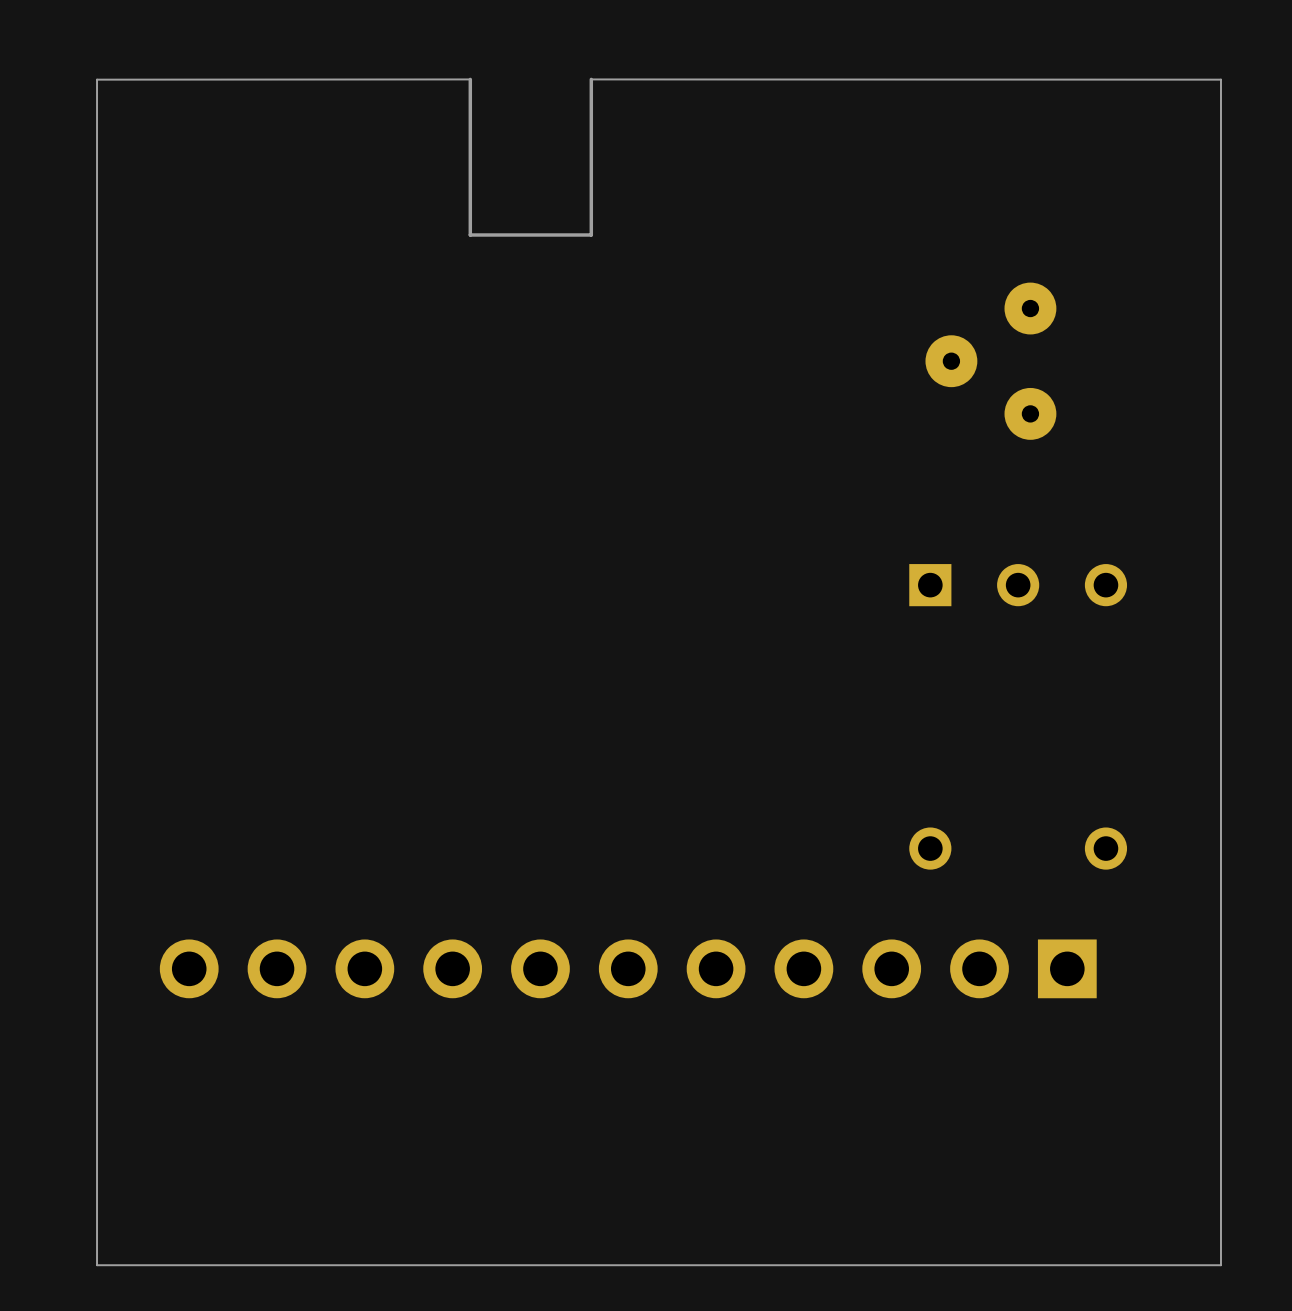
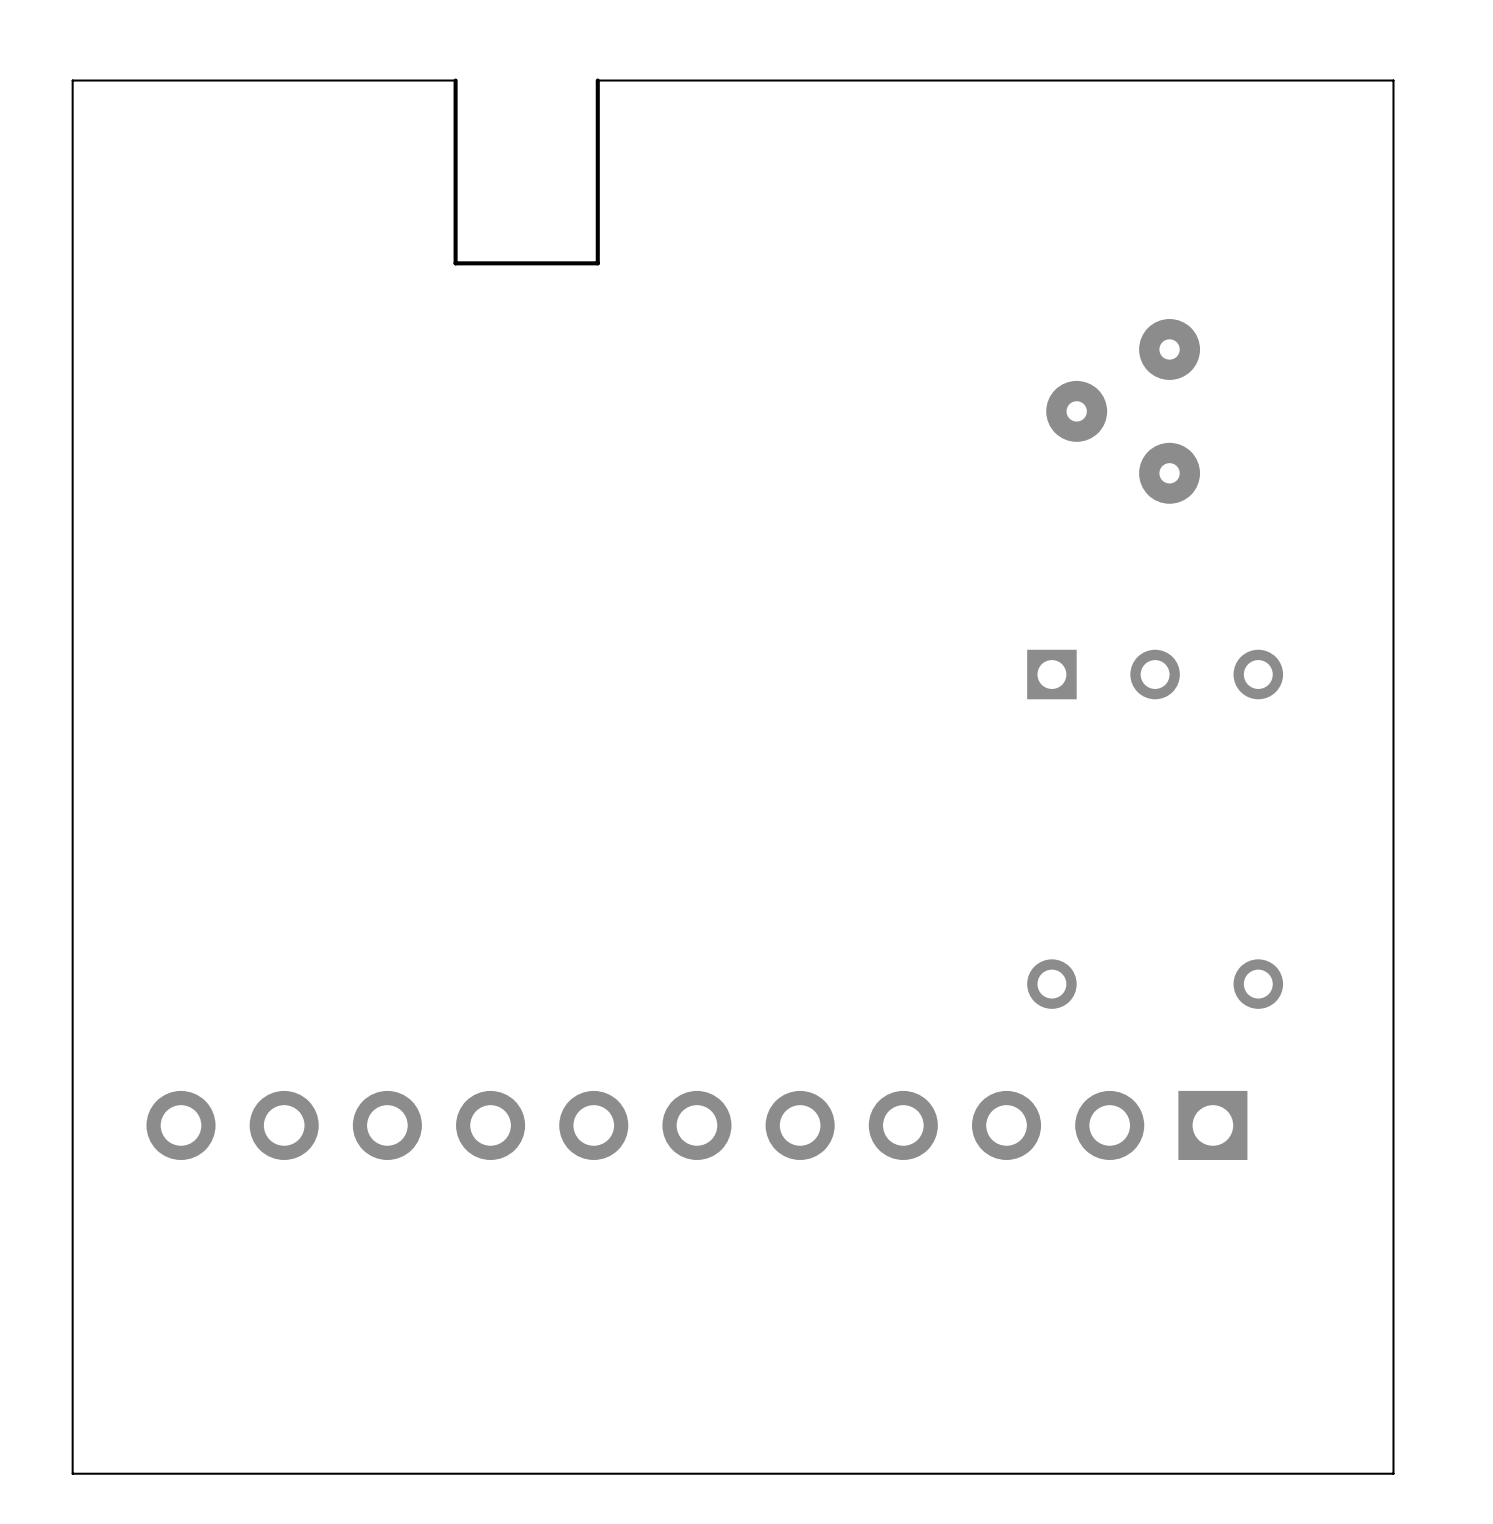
board edge: (470, 79) (97, 79) -> (455, 80) (72, 80)
board edge: (1220, 79) (591, 79) -> (1393, 80) (597, 80)
part position: (530, 157) -> (526, 171)

